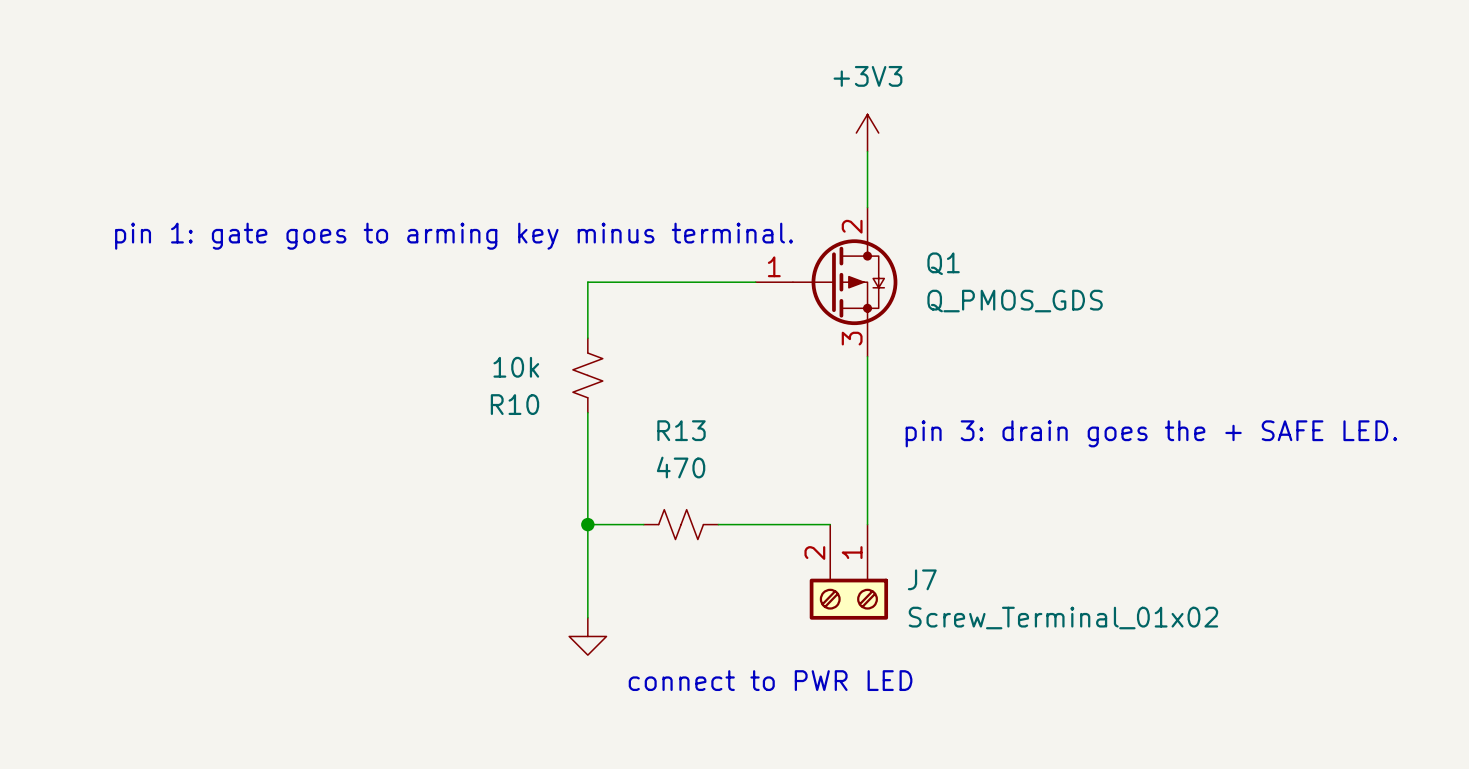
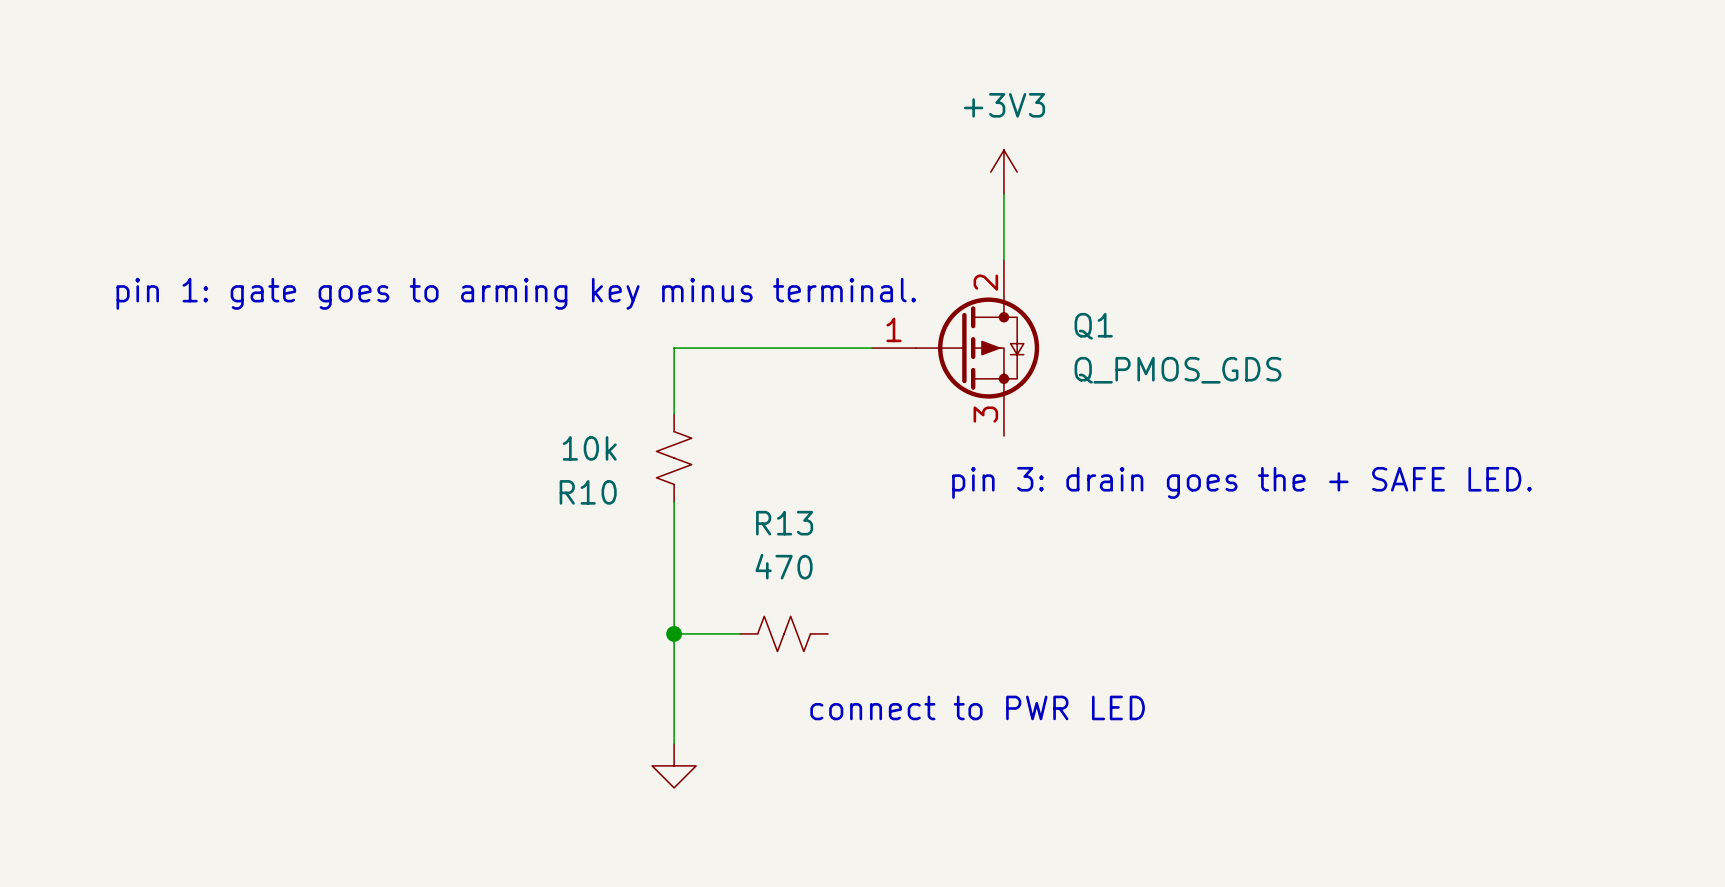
wire: (867, 356) (867, 524) -> none
text position: pin 3: drain goes the + SAFE LED. (1151, 433) -> pin 3: drain goes the + SAFE LED. (1242, 482)
wire: (718, 524) (830, 524) -> none
J7: Screw_Terminal_01x02 (848, 572) -> none
text position: connect to PWR LED (770, 680) -> connect to PWR LED (977, 707)

